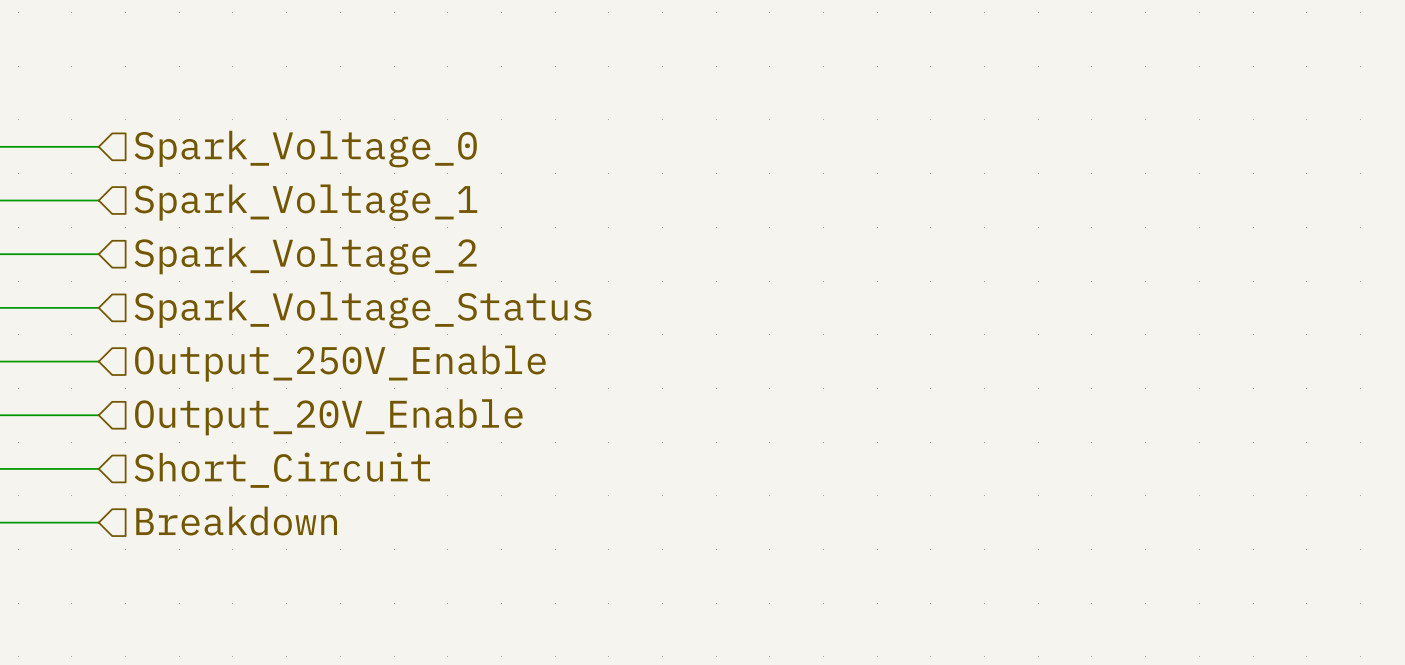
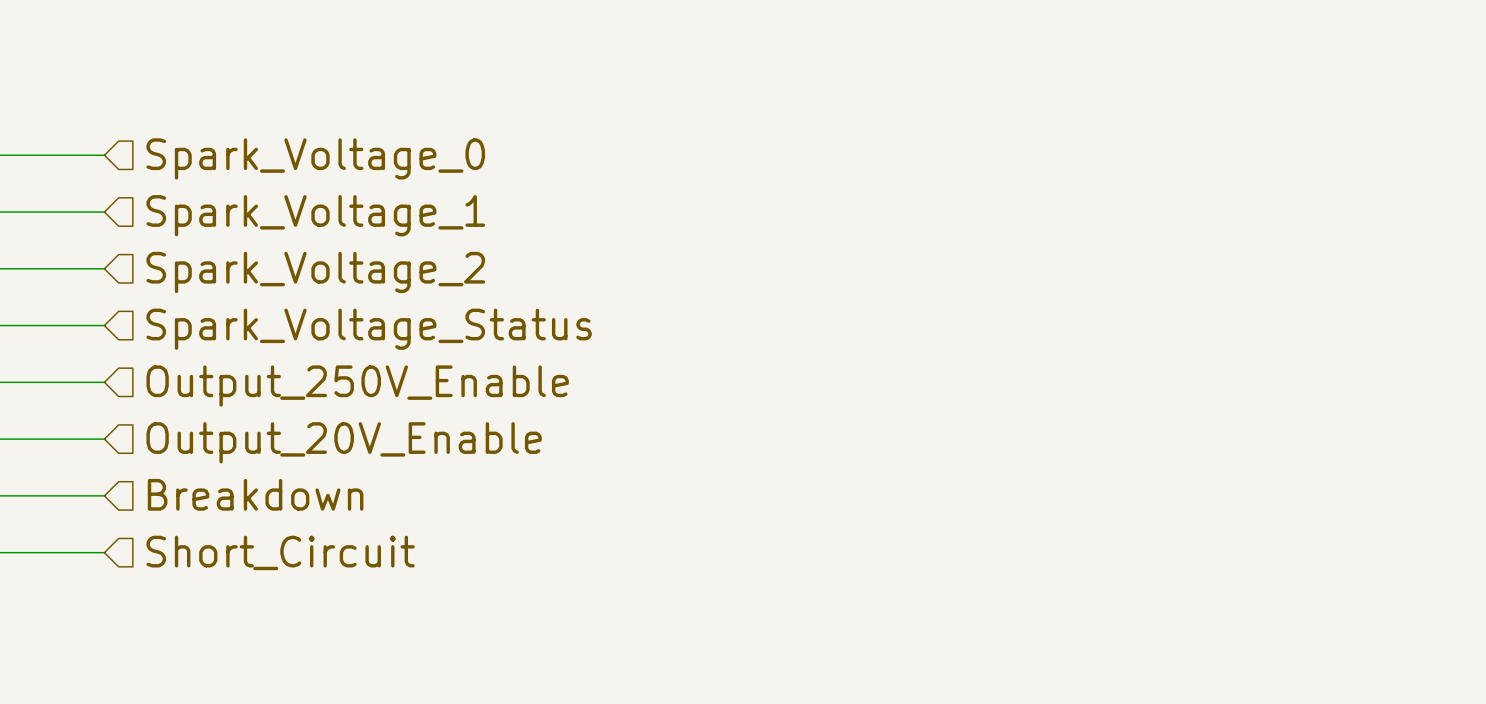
hierarchical label: Short_Circuit (282, 470) -> Breakdown (255, 494)
hierarchical label: Breakdown (236, 521) -> Short_Circuit (280, 552)

